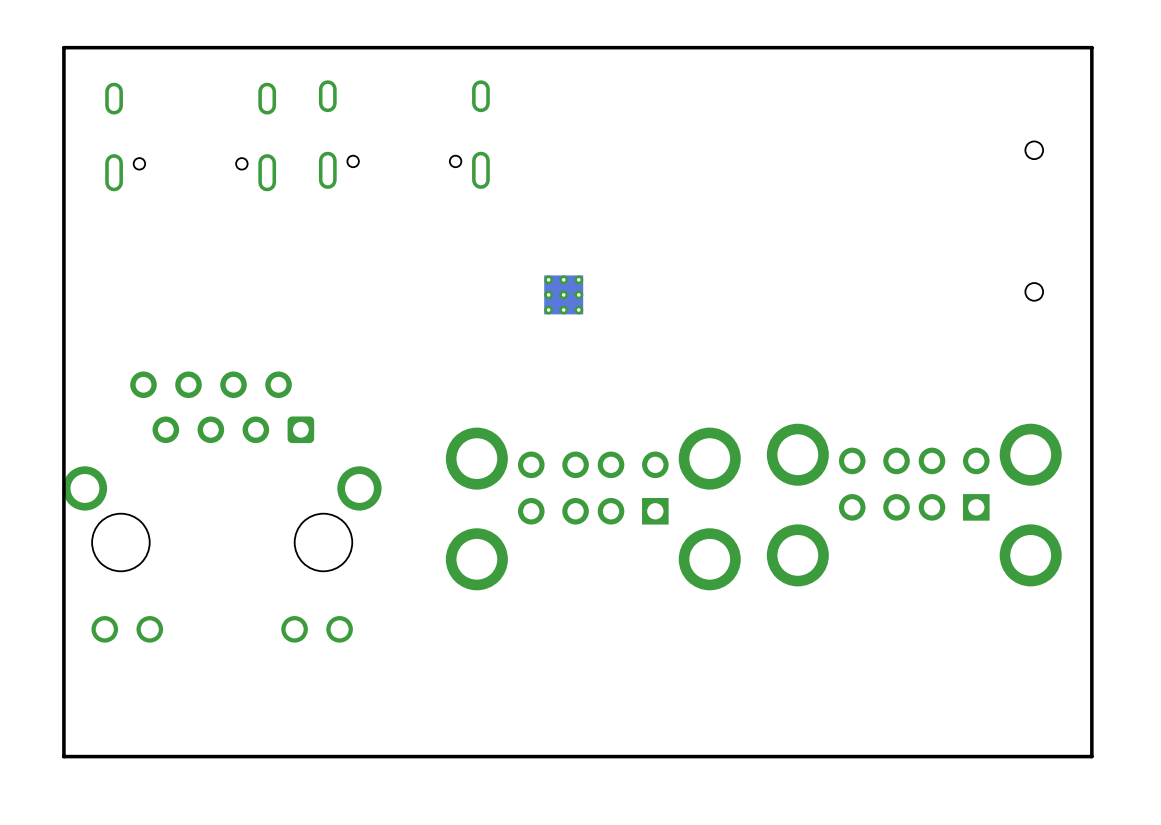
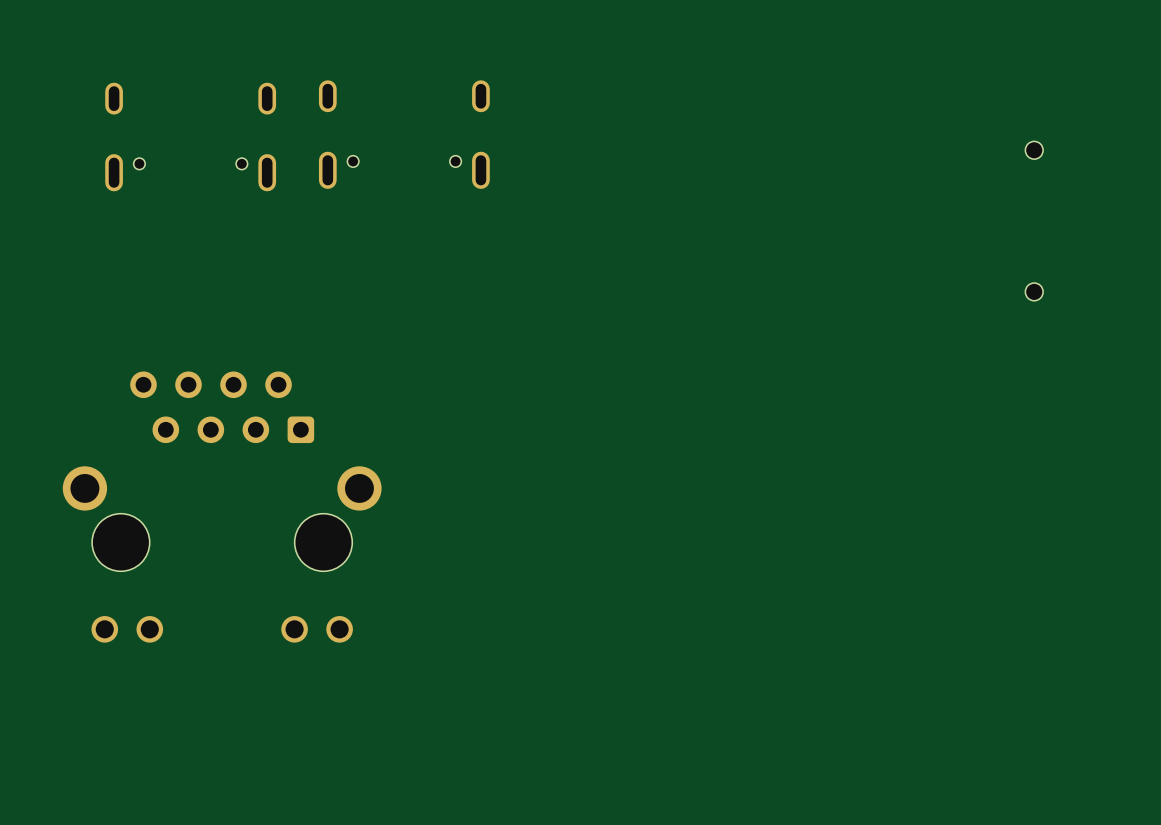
board edge: (1091, 47) (63, 47) (63, 756) (1091, 756) (1091, 47) -> none
part: (563, 294) -> none
part: (914, 505) -> none
part: (593, 508) -> none

